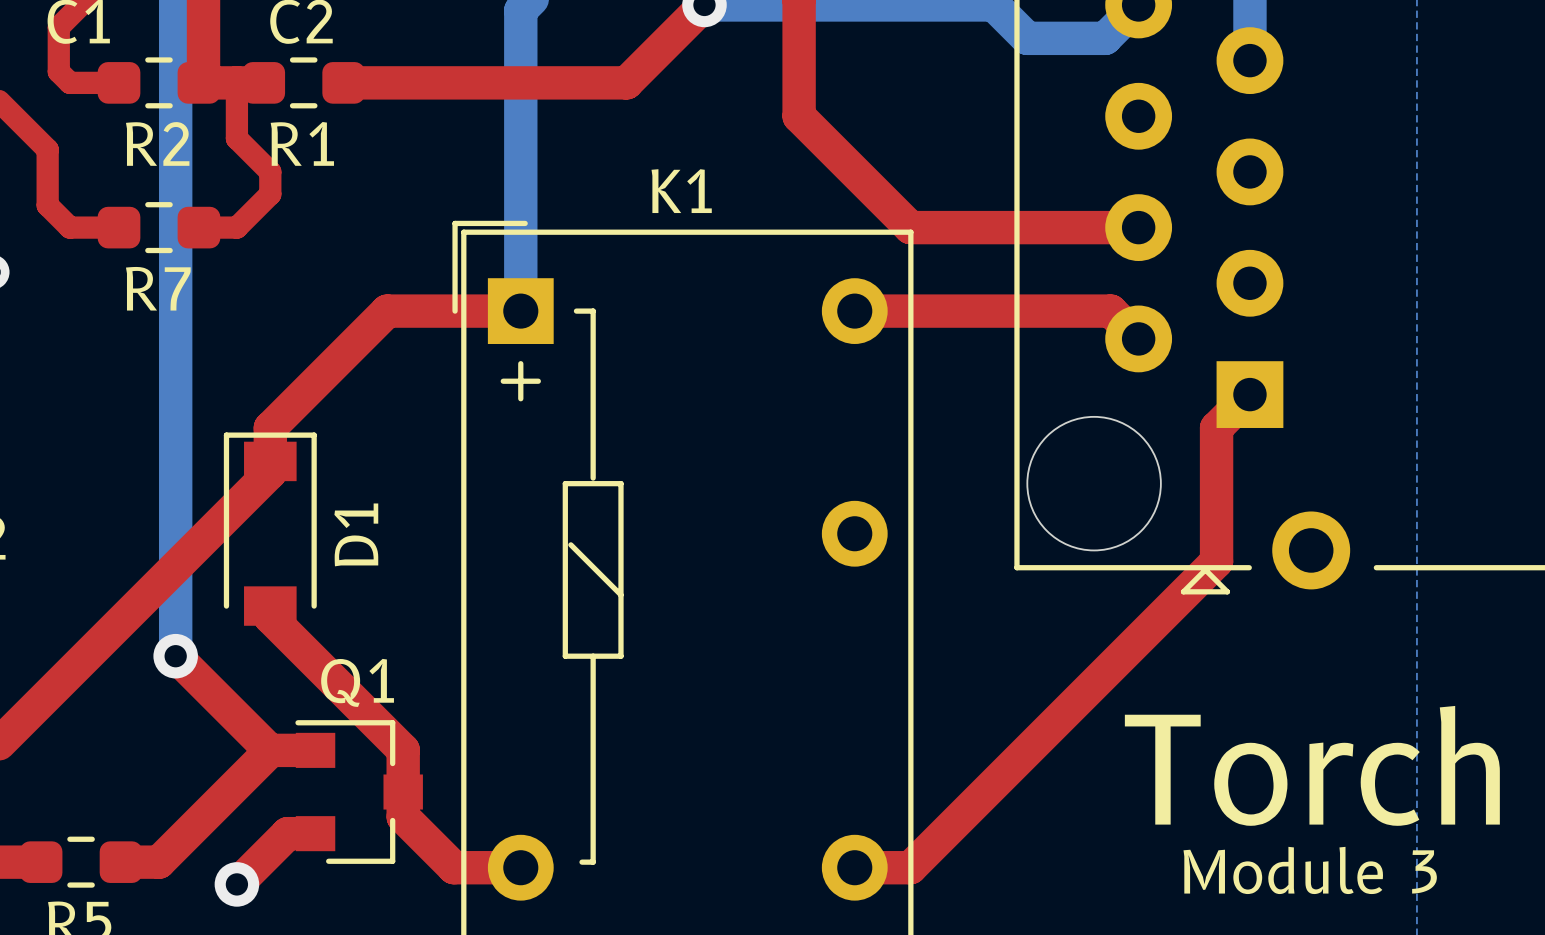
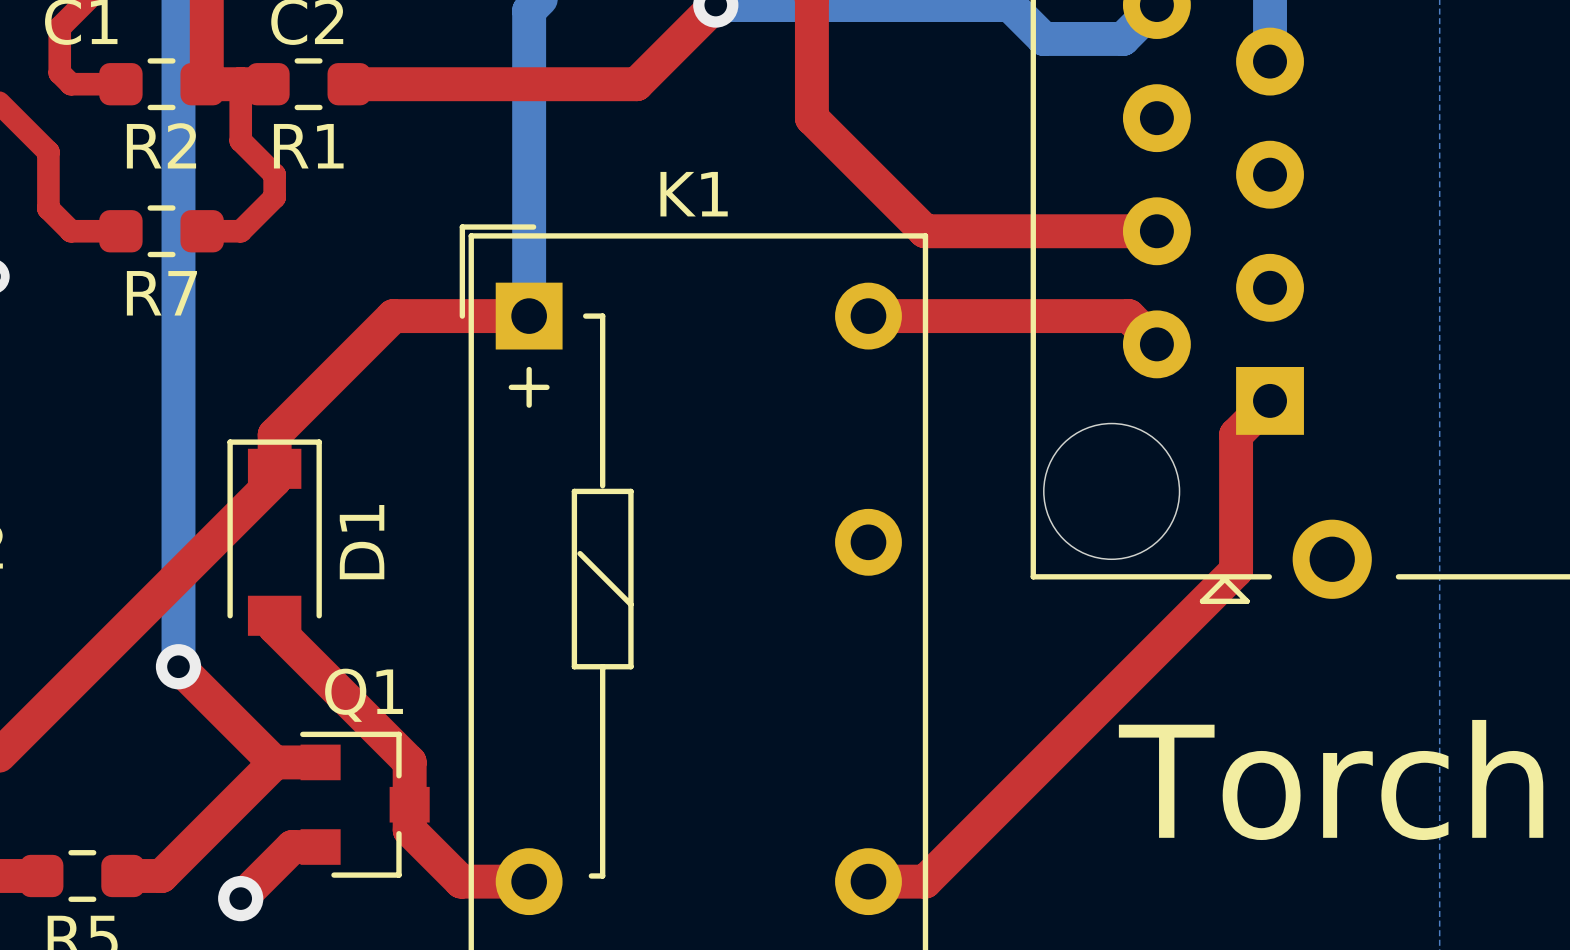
text: Module 3 (1310, 870) -> none

